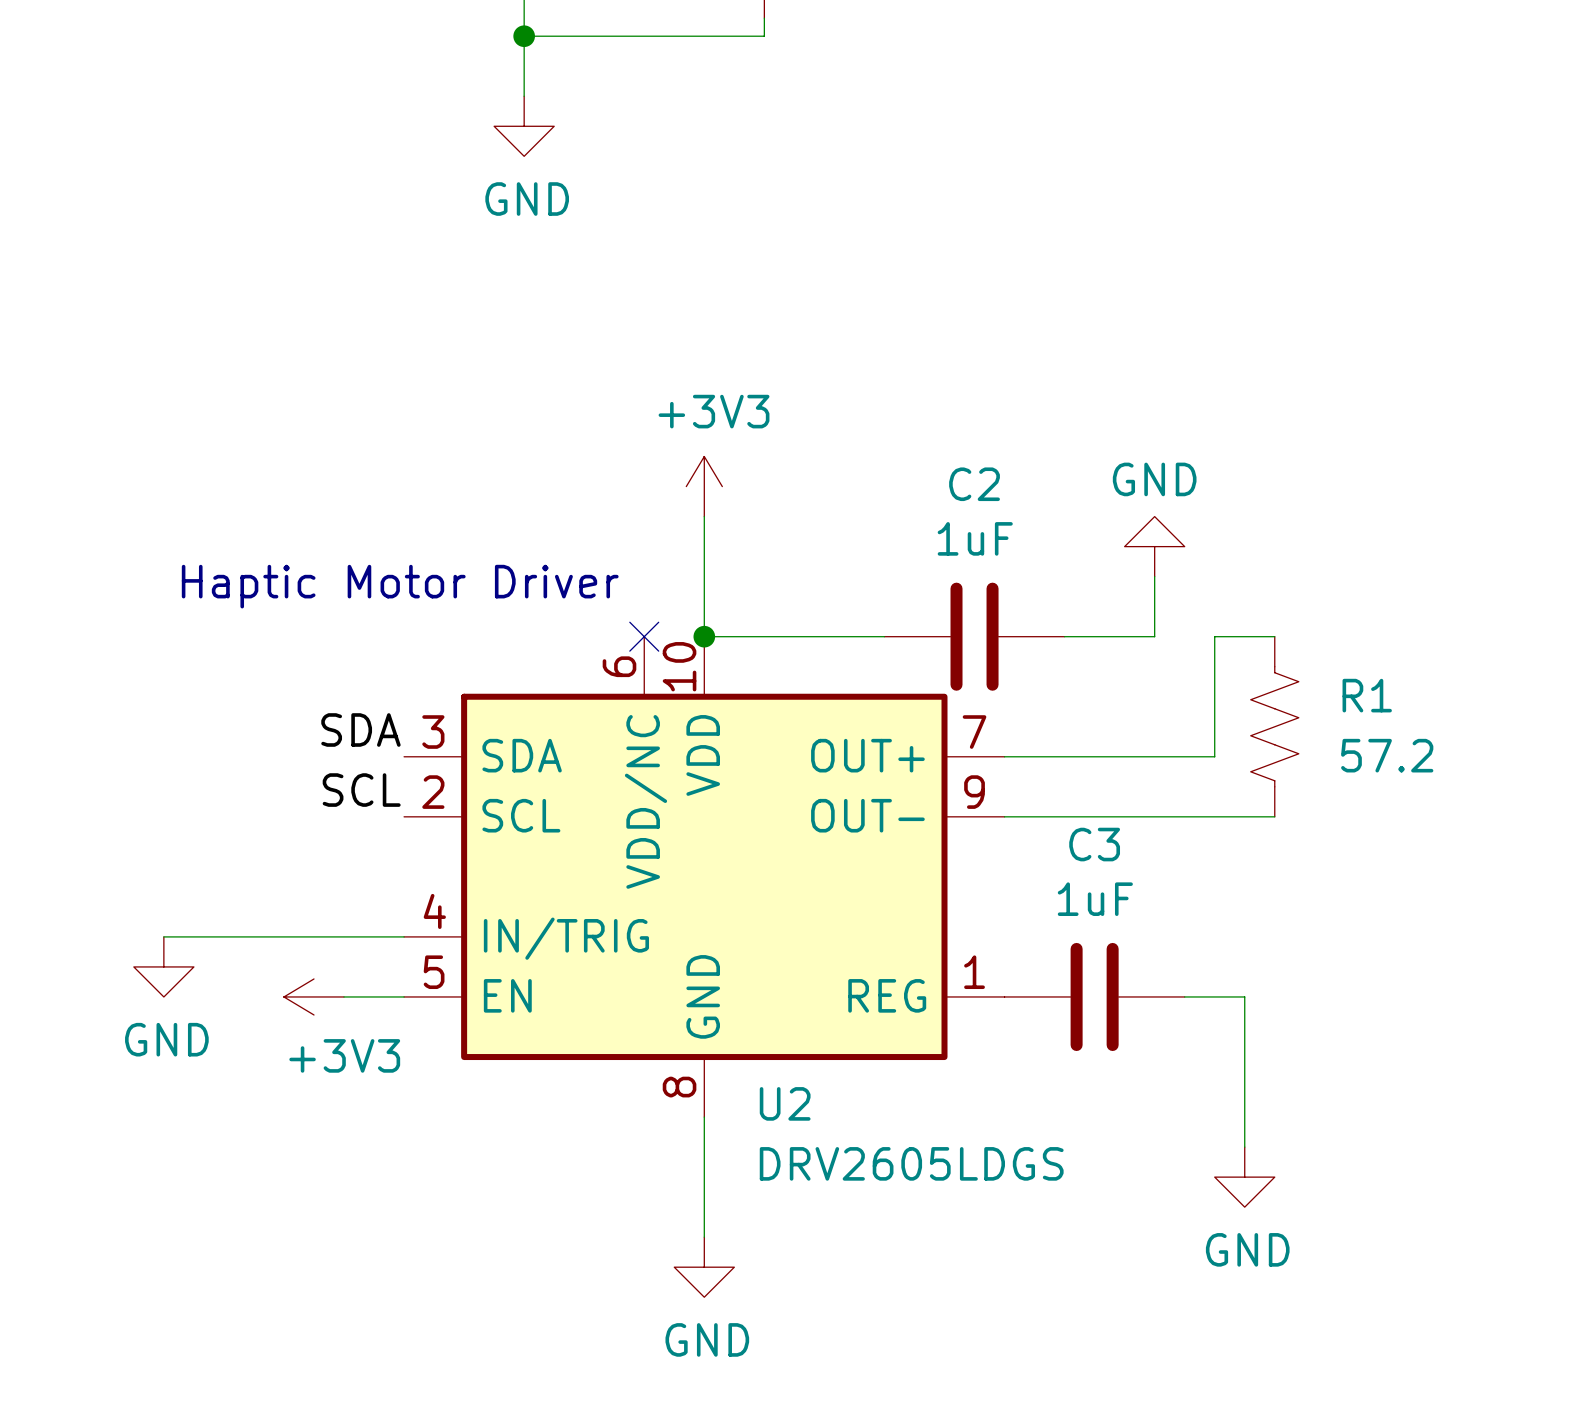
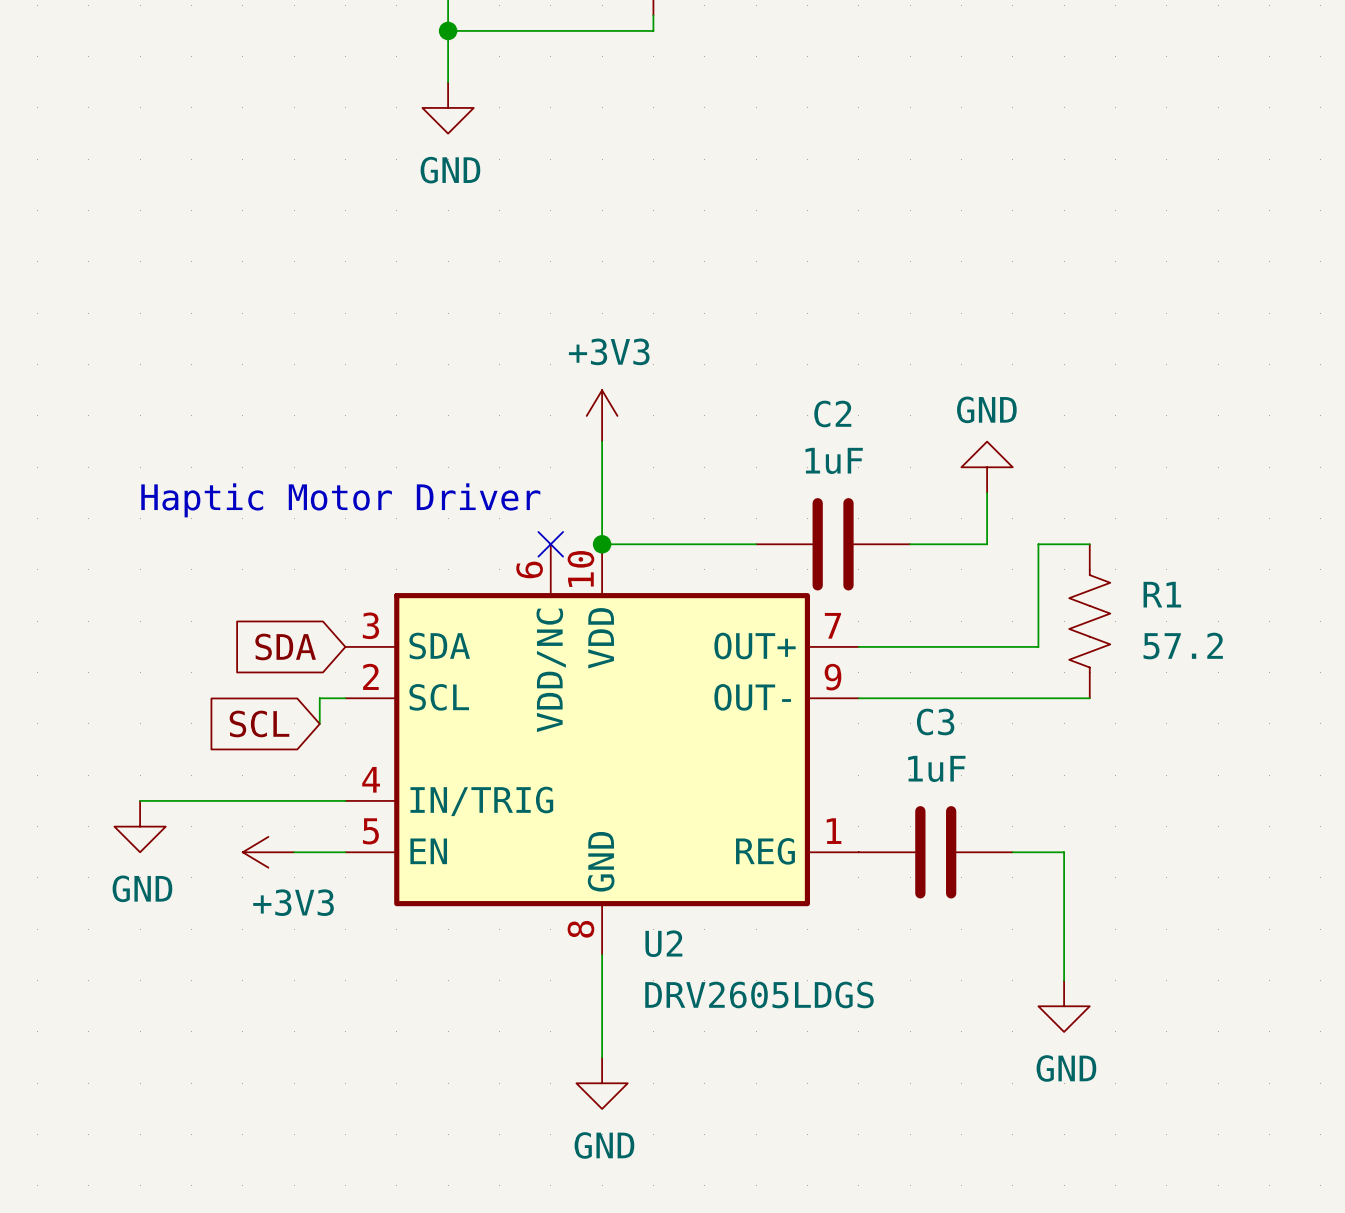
label: SDA (360, 729) -> none
global label: none -> SDA (285, 646)
label: SCL (361, 790) -> none
wire: none -> (345, 698) (319, 698) (319, 723)
global label: none -> SCL (259, 723)

